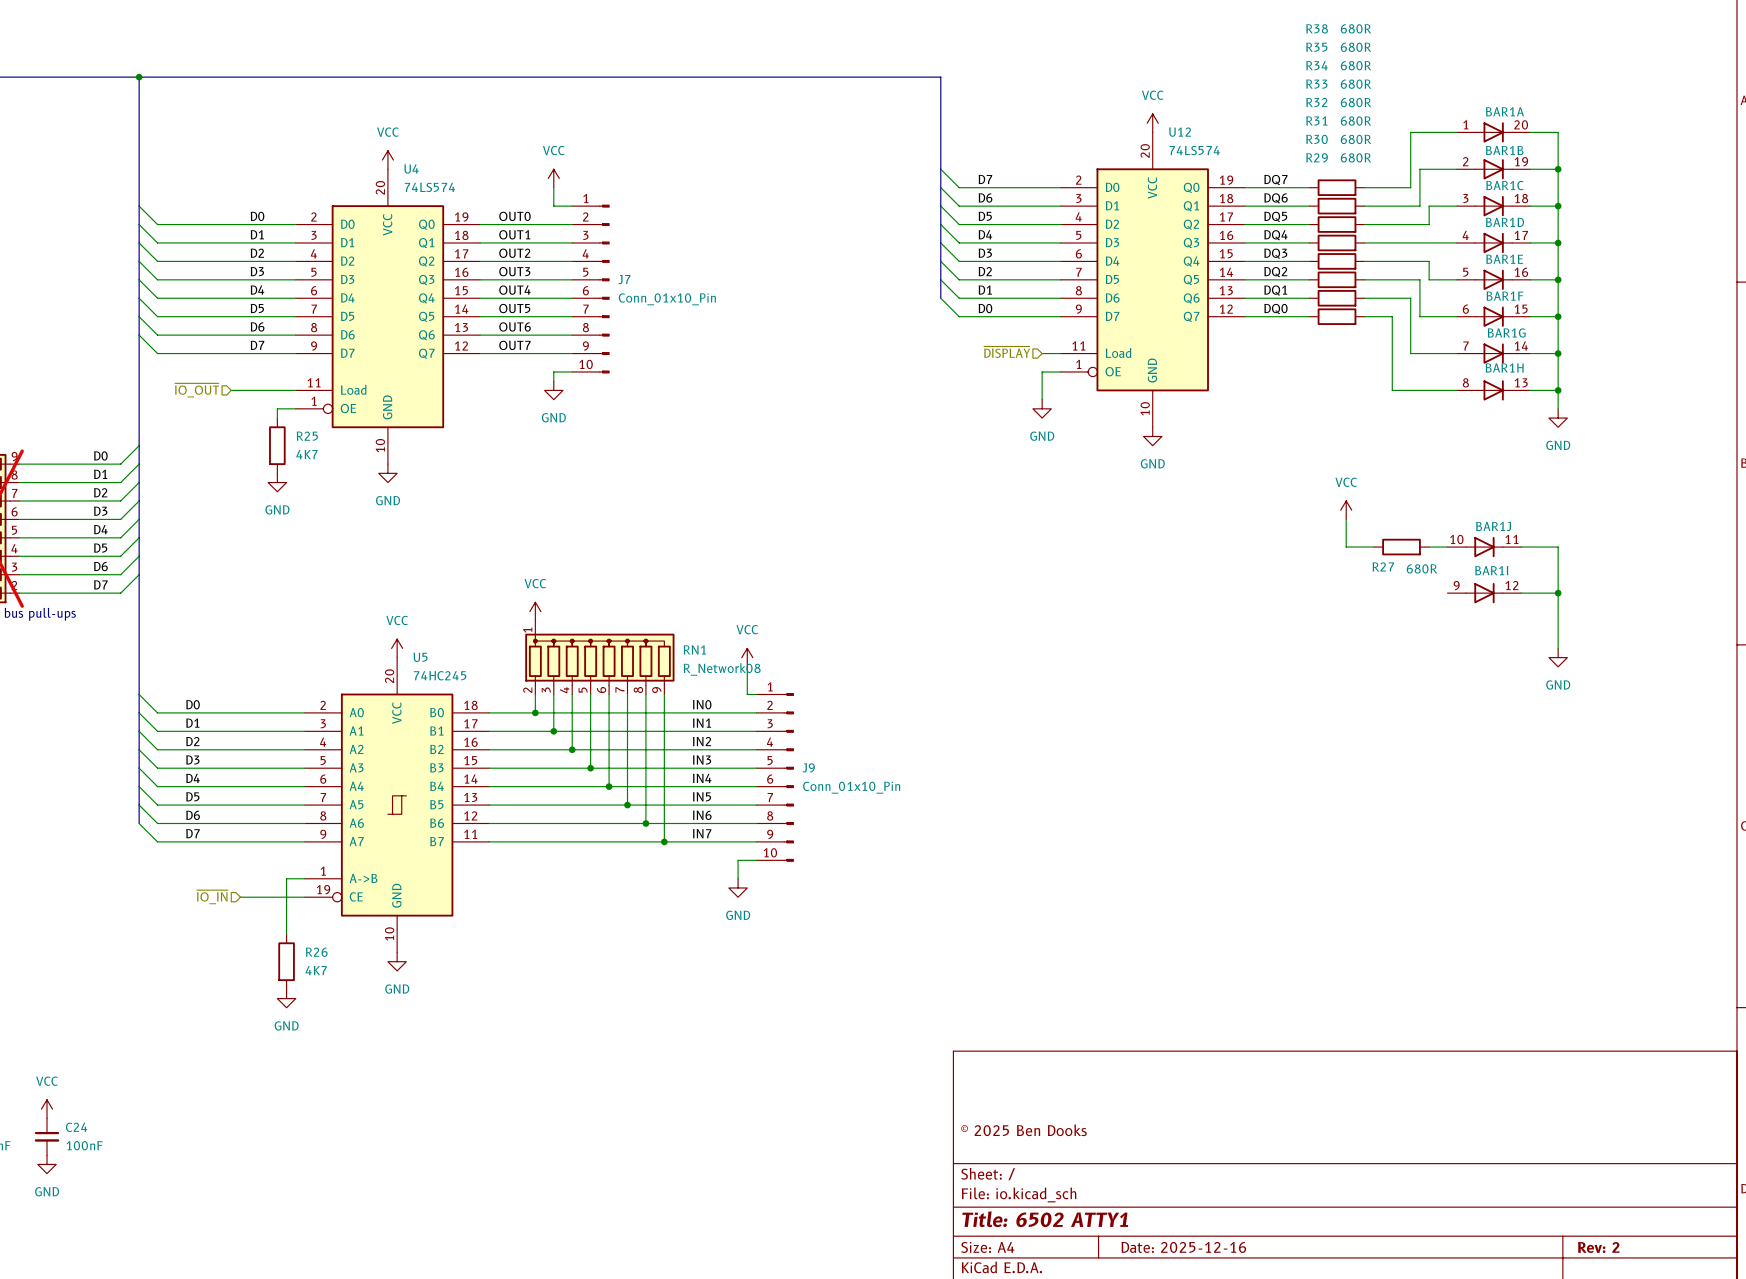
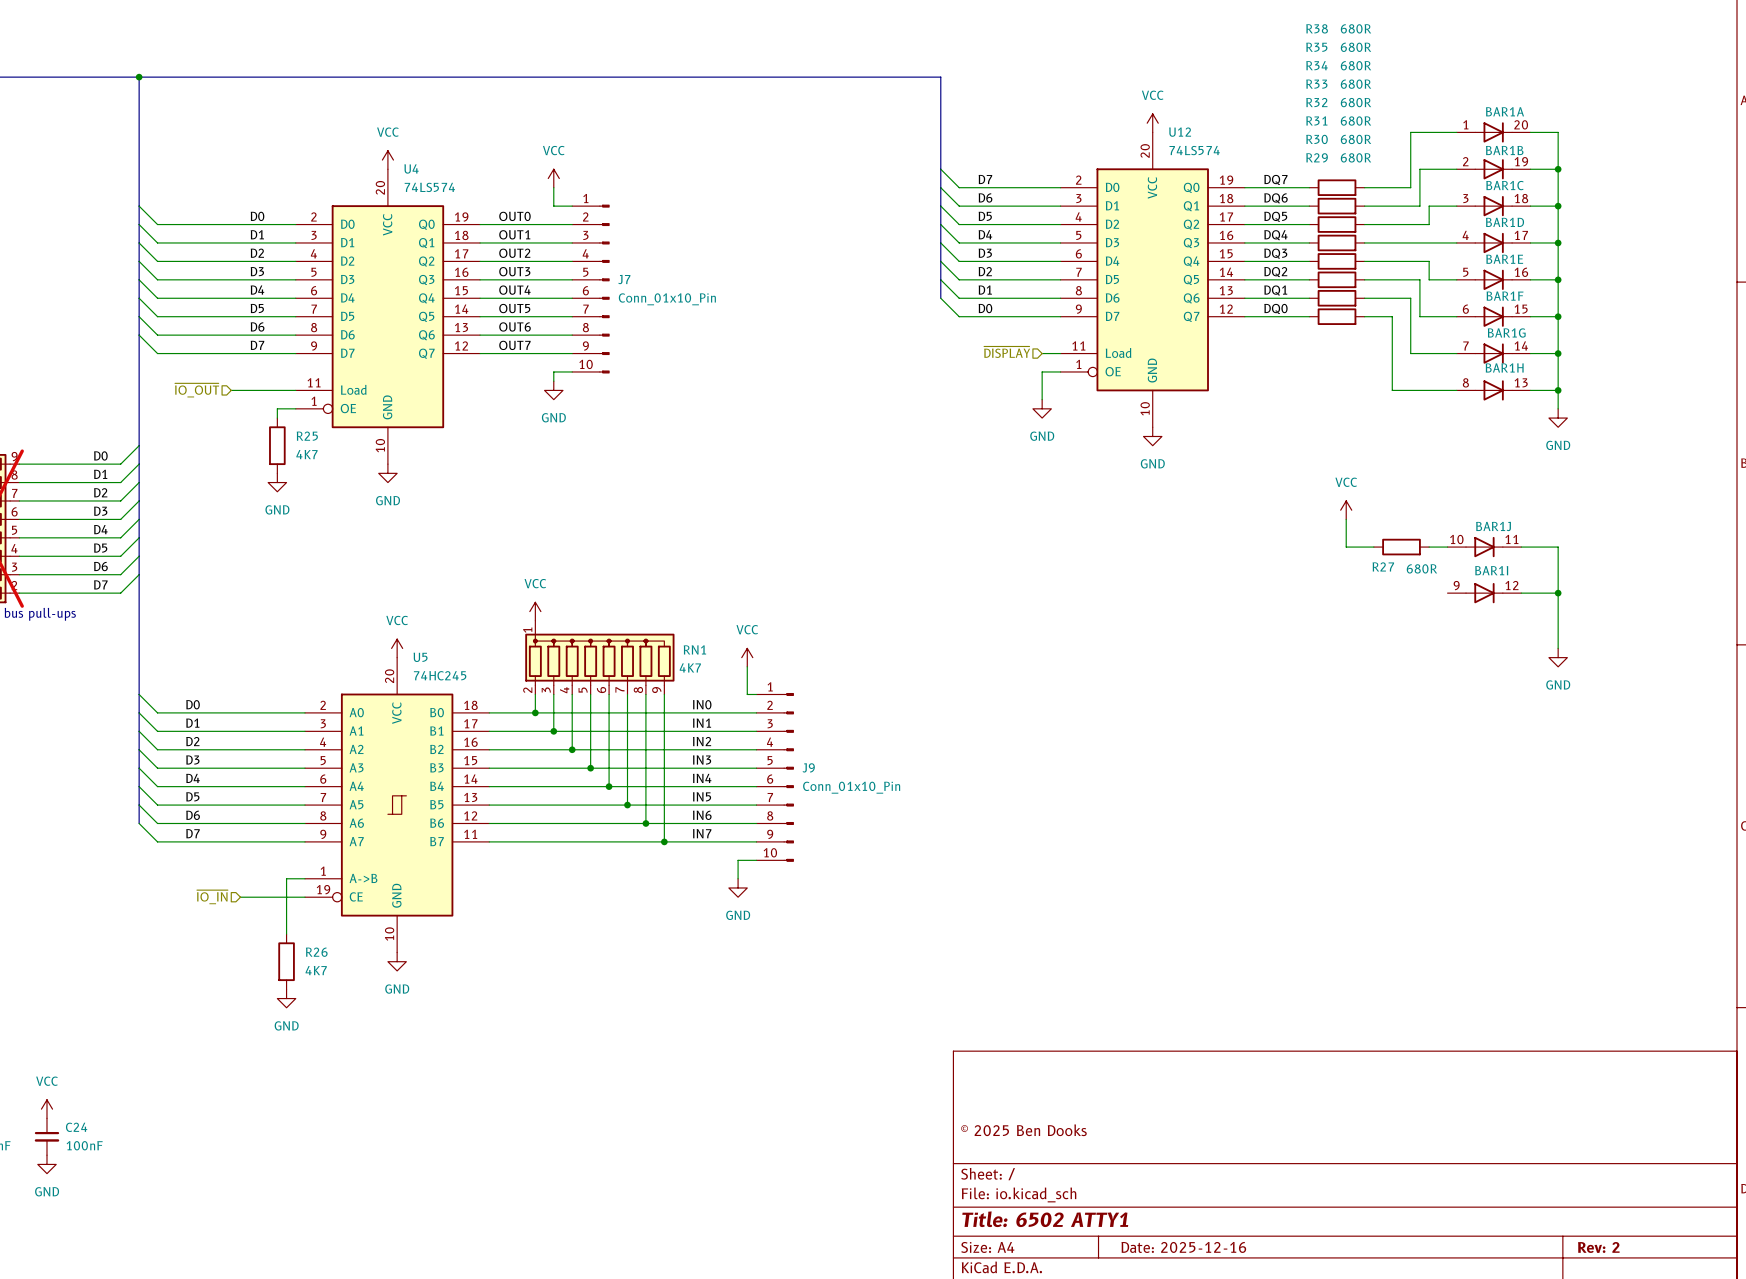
RN1 value: R_Network08 (722, 669) -> 4K7 (690, 667)

